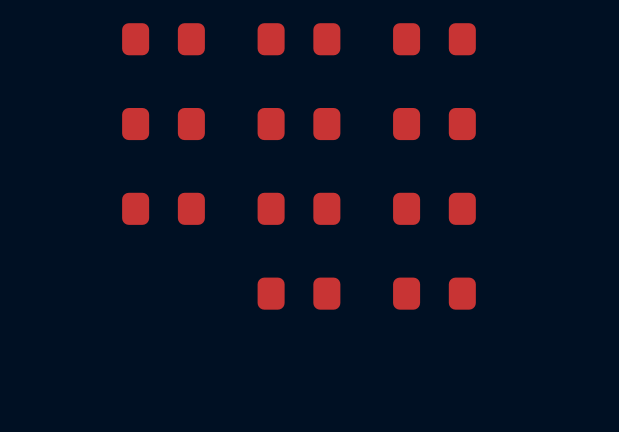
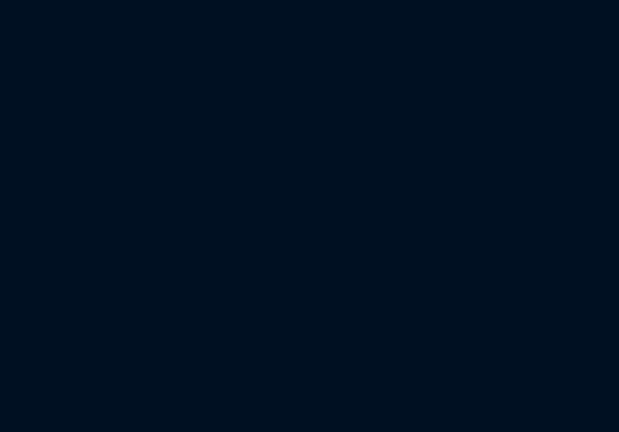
part: (163, 39) -> none
part: (298, 39) -> none
part: (434, 39) -> none
part: (163, 124) -> none
part: (298, 124) -> none
part: (434, 124) -> none
part: (163, 208) -> none
part: (298, 208) -> none
part: (434, 208) -> none
part: (298, 293) -> none
part: (434, 293) -> none

